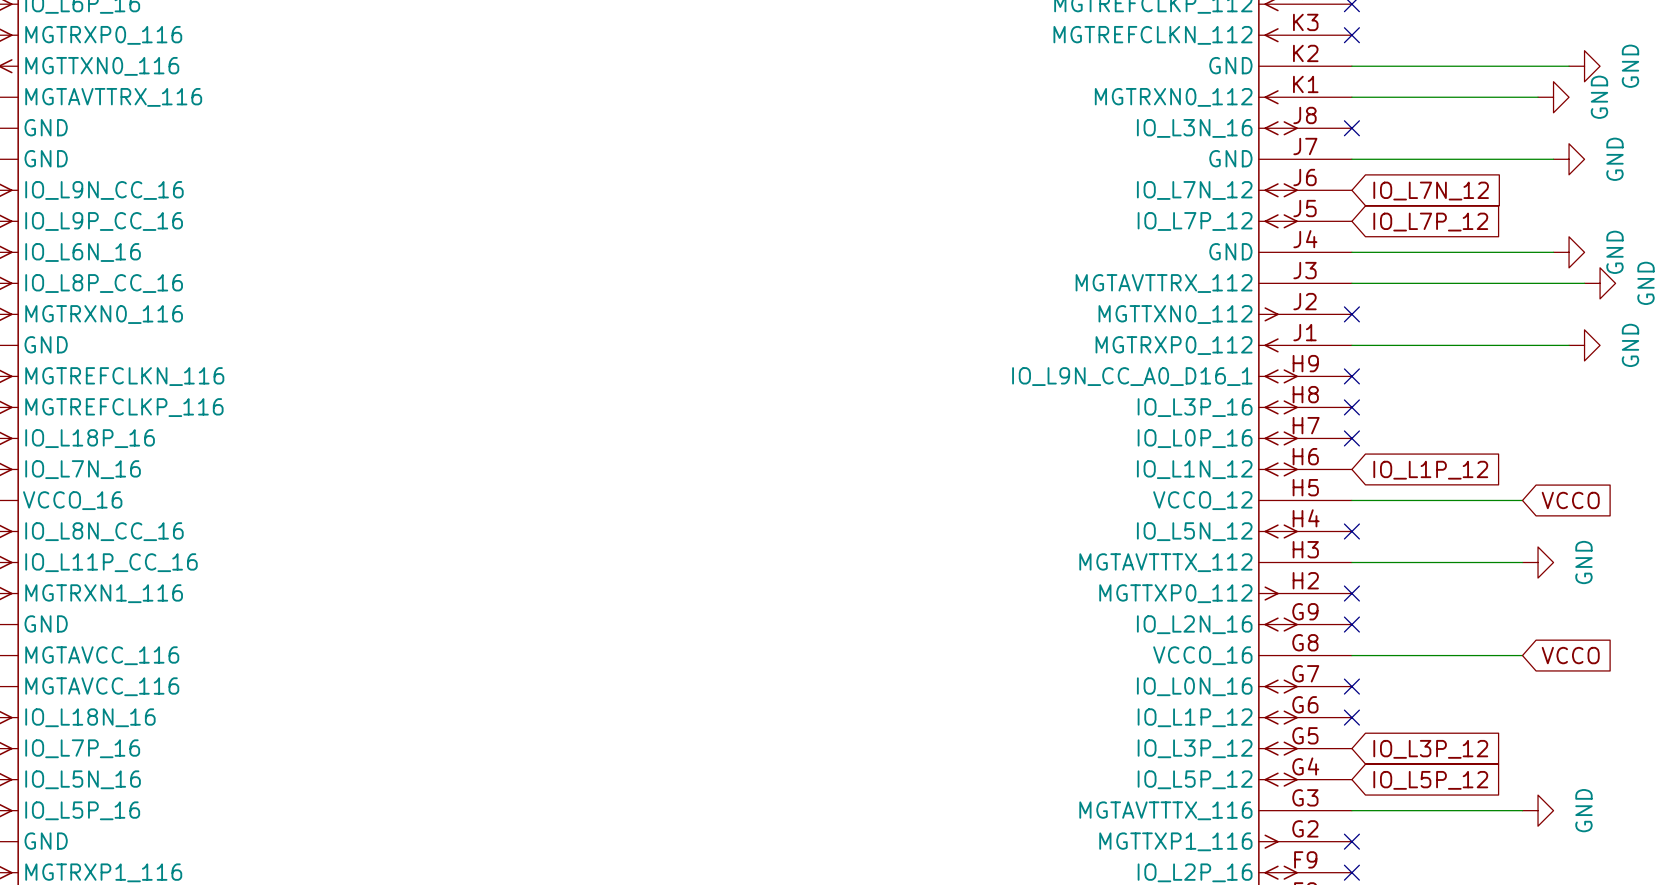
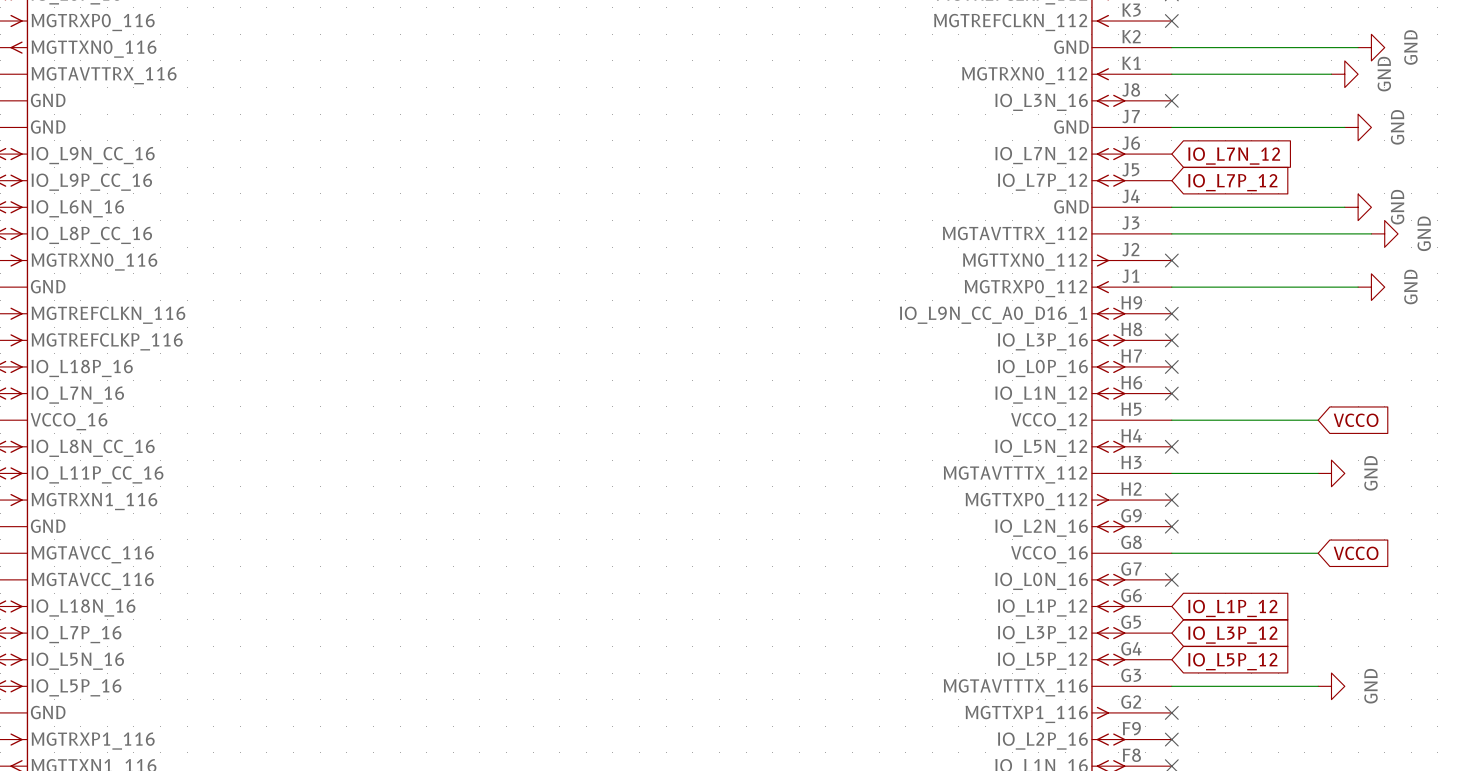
no-connect mark: none -> (1171, 393)
global label position: IO_L1P_12 (1430, 470) -> IO_L1P_12 (1232, 608)
no-connect mark: (1351, 717) -> none

